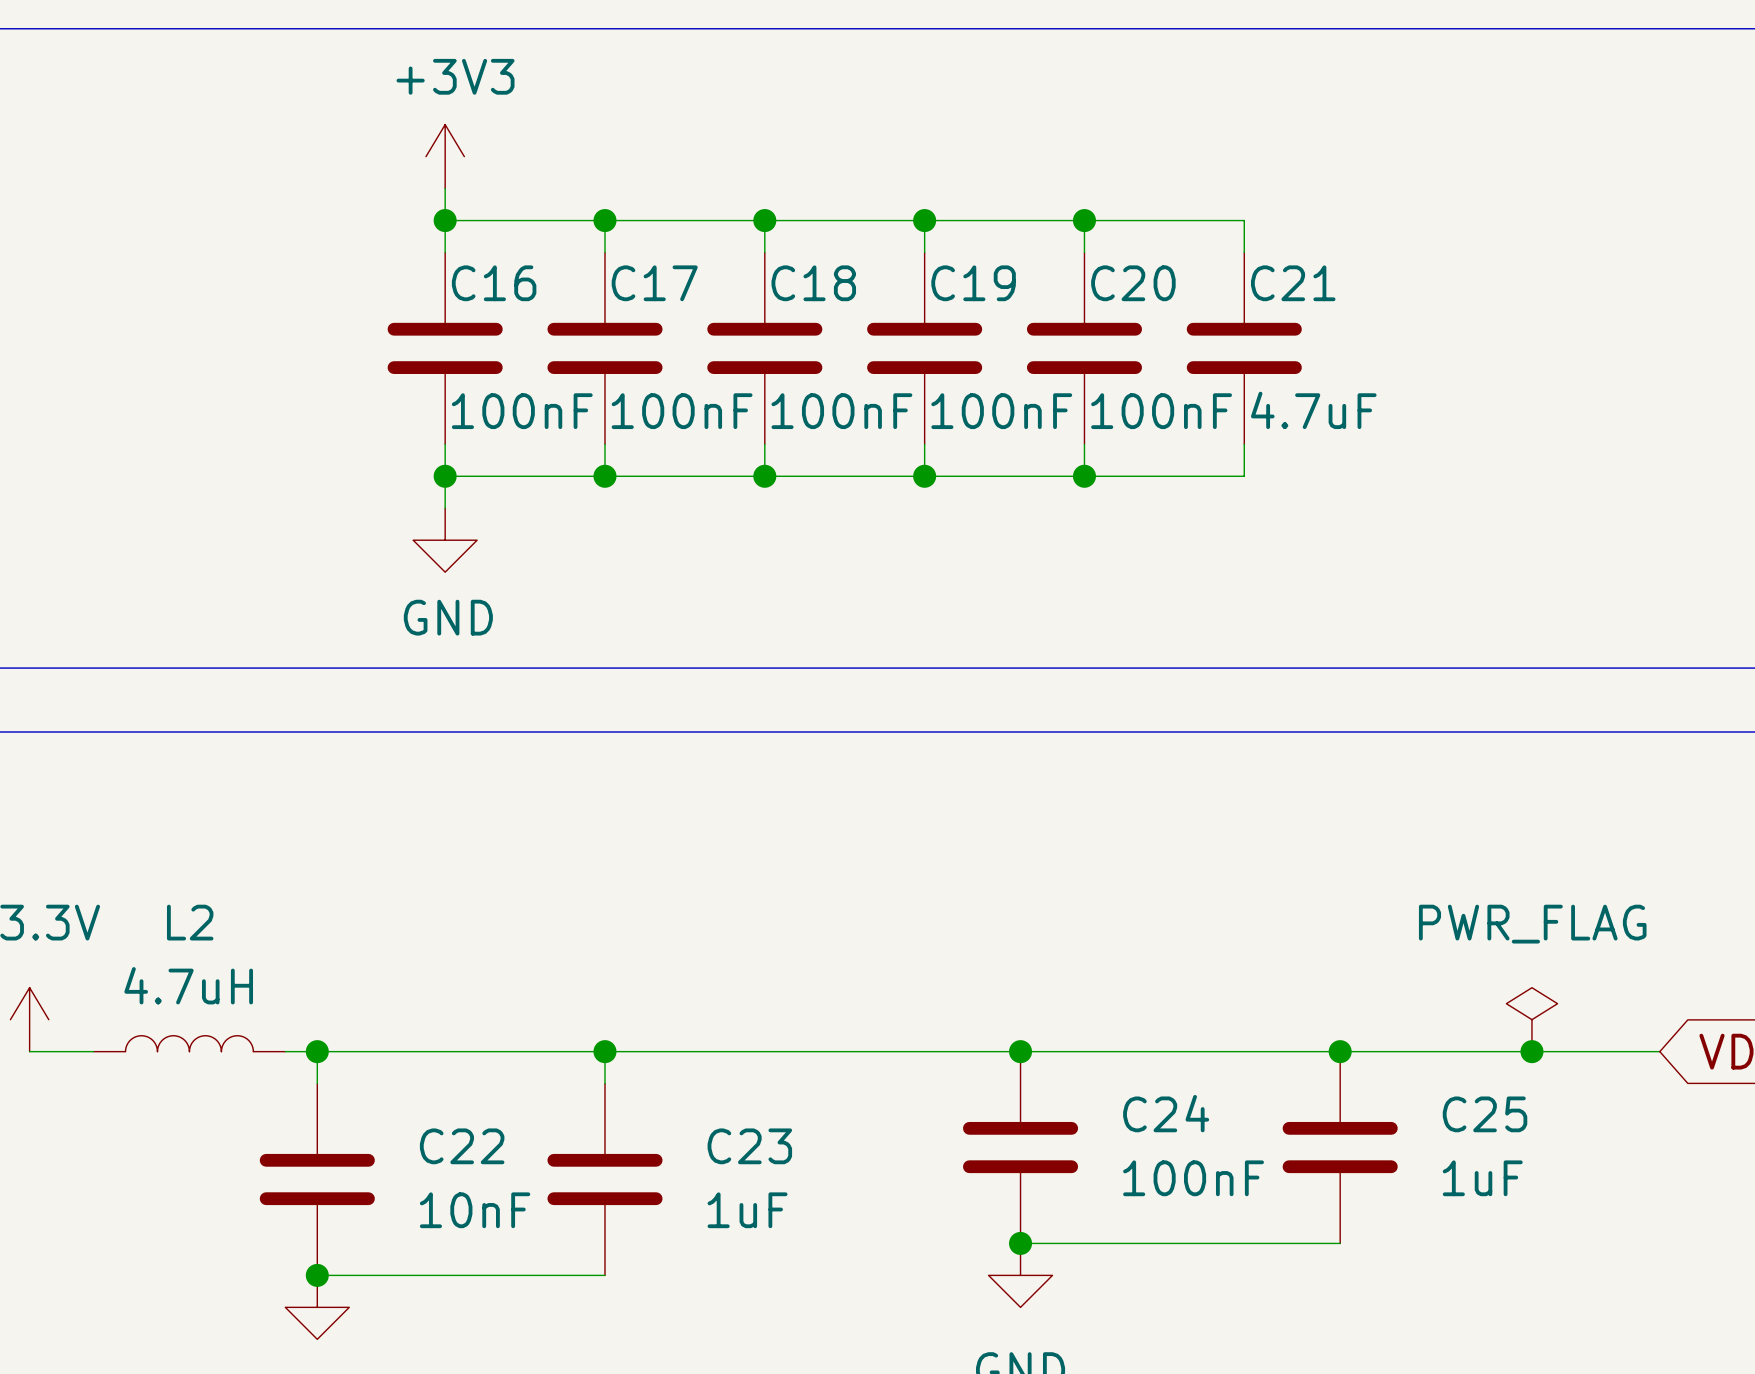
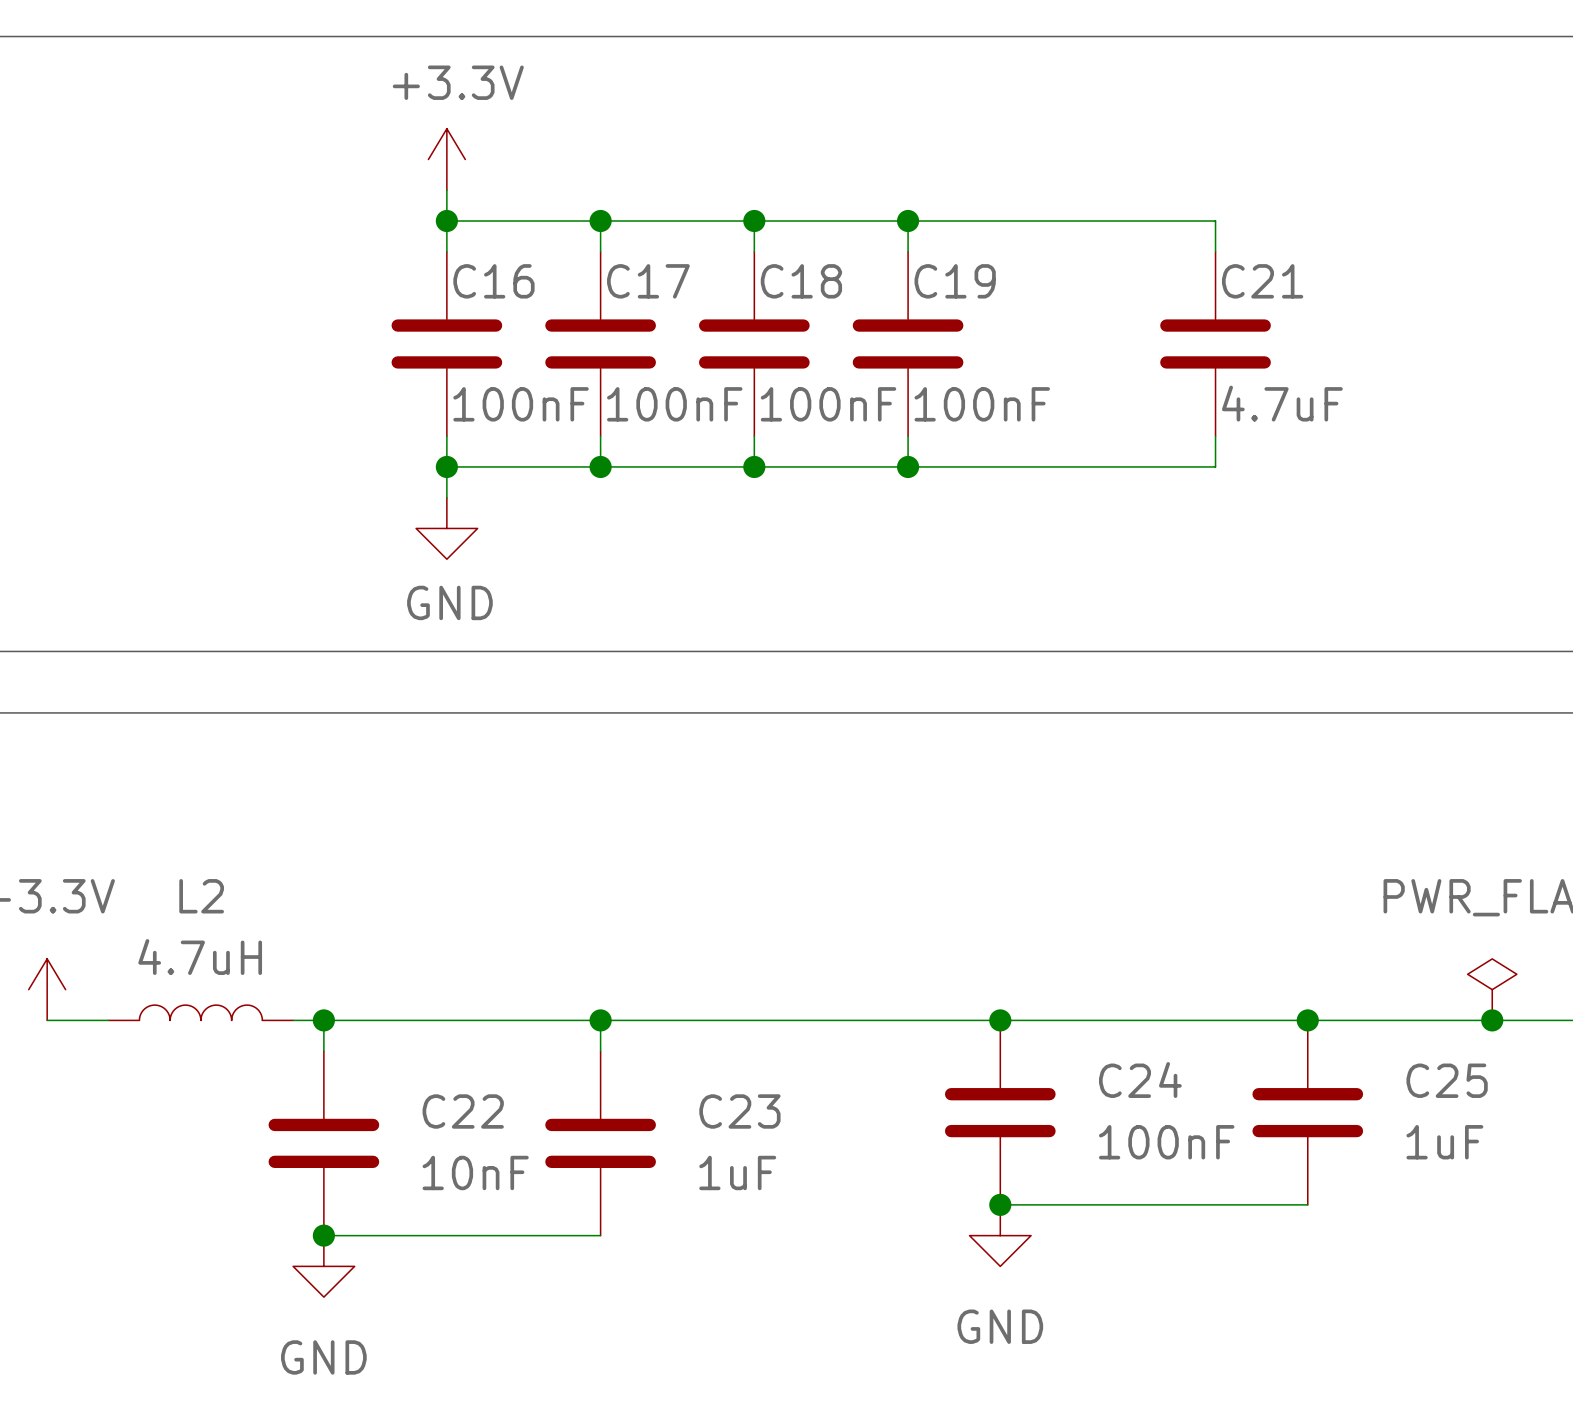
power symbol: +3V3 (445, 156) -> +3.3V (446, 159)
wire: (1084, 220) (1084, 252) -> none
junction: (1084, 220) -> none
C20: 100nF (1084, 348) -> none
wire: (1084, 444) (1084, 476) -> none
junction: (1084, 476) -> none

